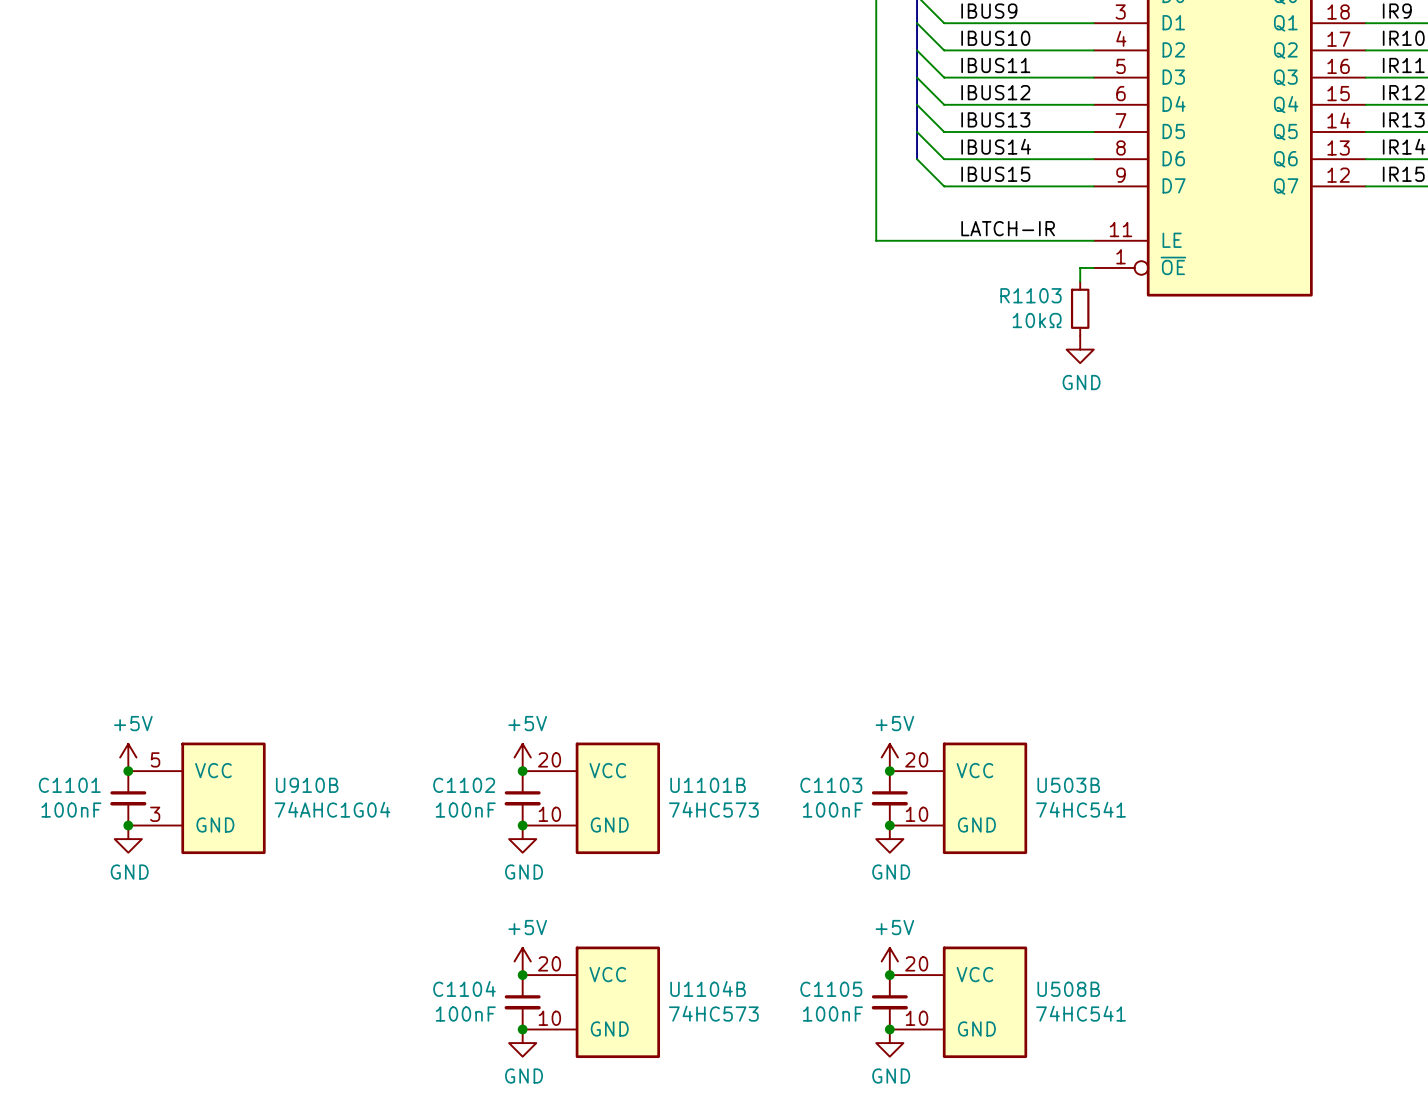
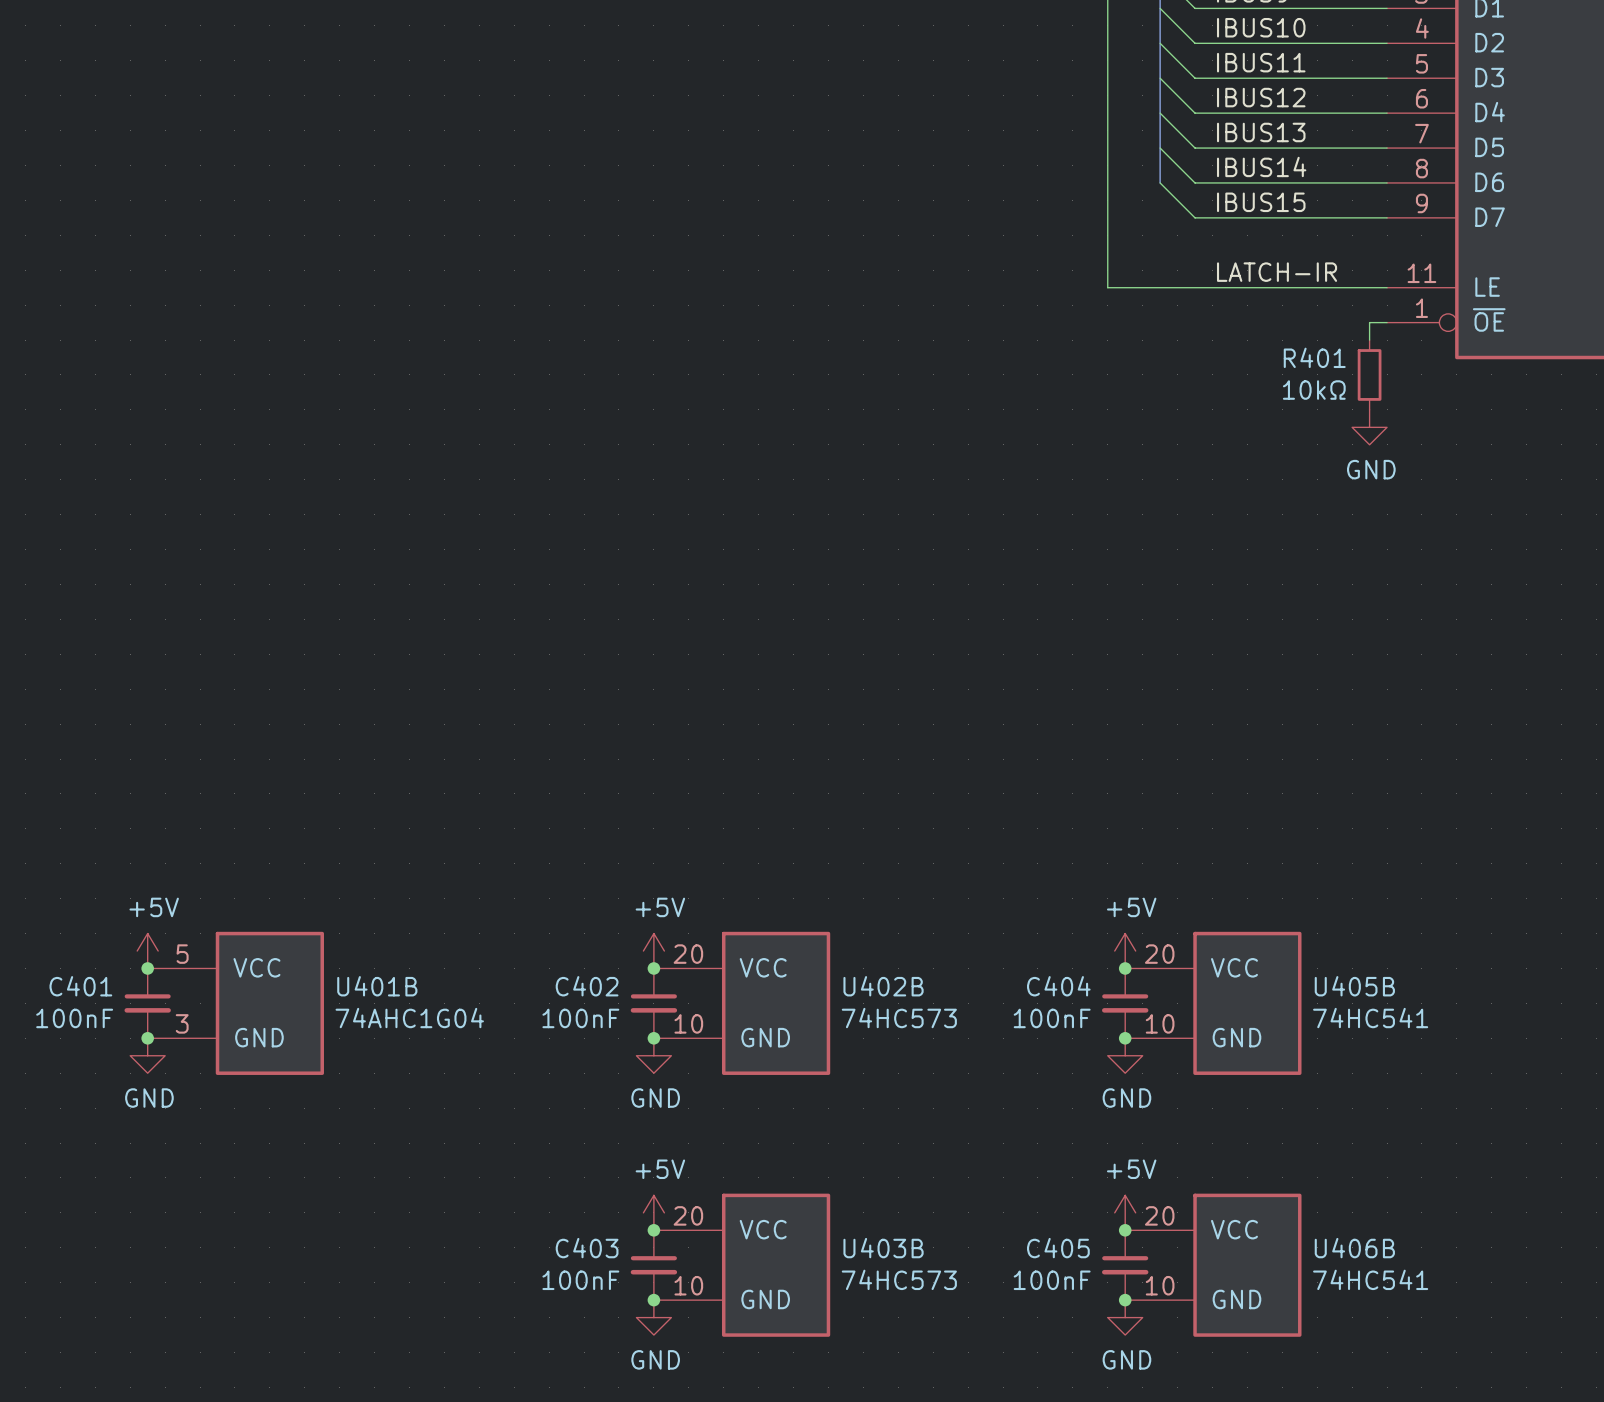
R1103 name: R1103 (1030, 295) -> R401 (1314, 357)
C1101 name: C1101 (69, 785) -> C401 (80, 986)
U910B name: U910B (307, 785) -> U401B (377, 986)
C1102 name: C1102 (464, 785) -> C402 (587, 986)
U1101B name: U1101B (708, 785) -> U402B (883, 986)
C1103 name: C1103 (831, 785) -> C404 (1058, 986)
U503B name: U503B (1068, 785) -> U405B (1354, 986)
C1104 name: C1104 (464, 988) -> C403 (587, 1248)
U1104B name: U1104B (708, 988) -> U403B (883, 1248)
C1105 name: C1105 (831, 989) -> C405 (1058, 1248)
U508B name: U508B (1068, 989) -> U406B (1354, 1248)

